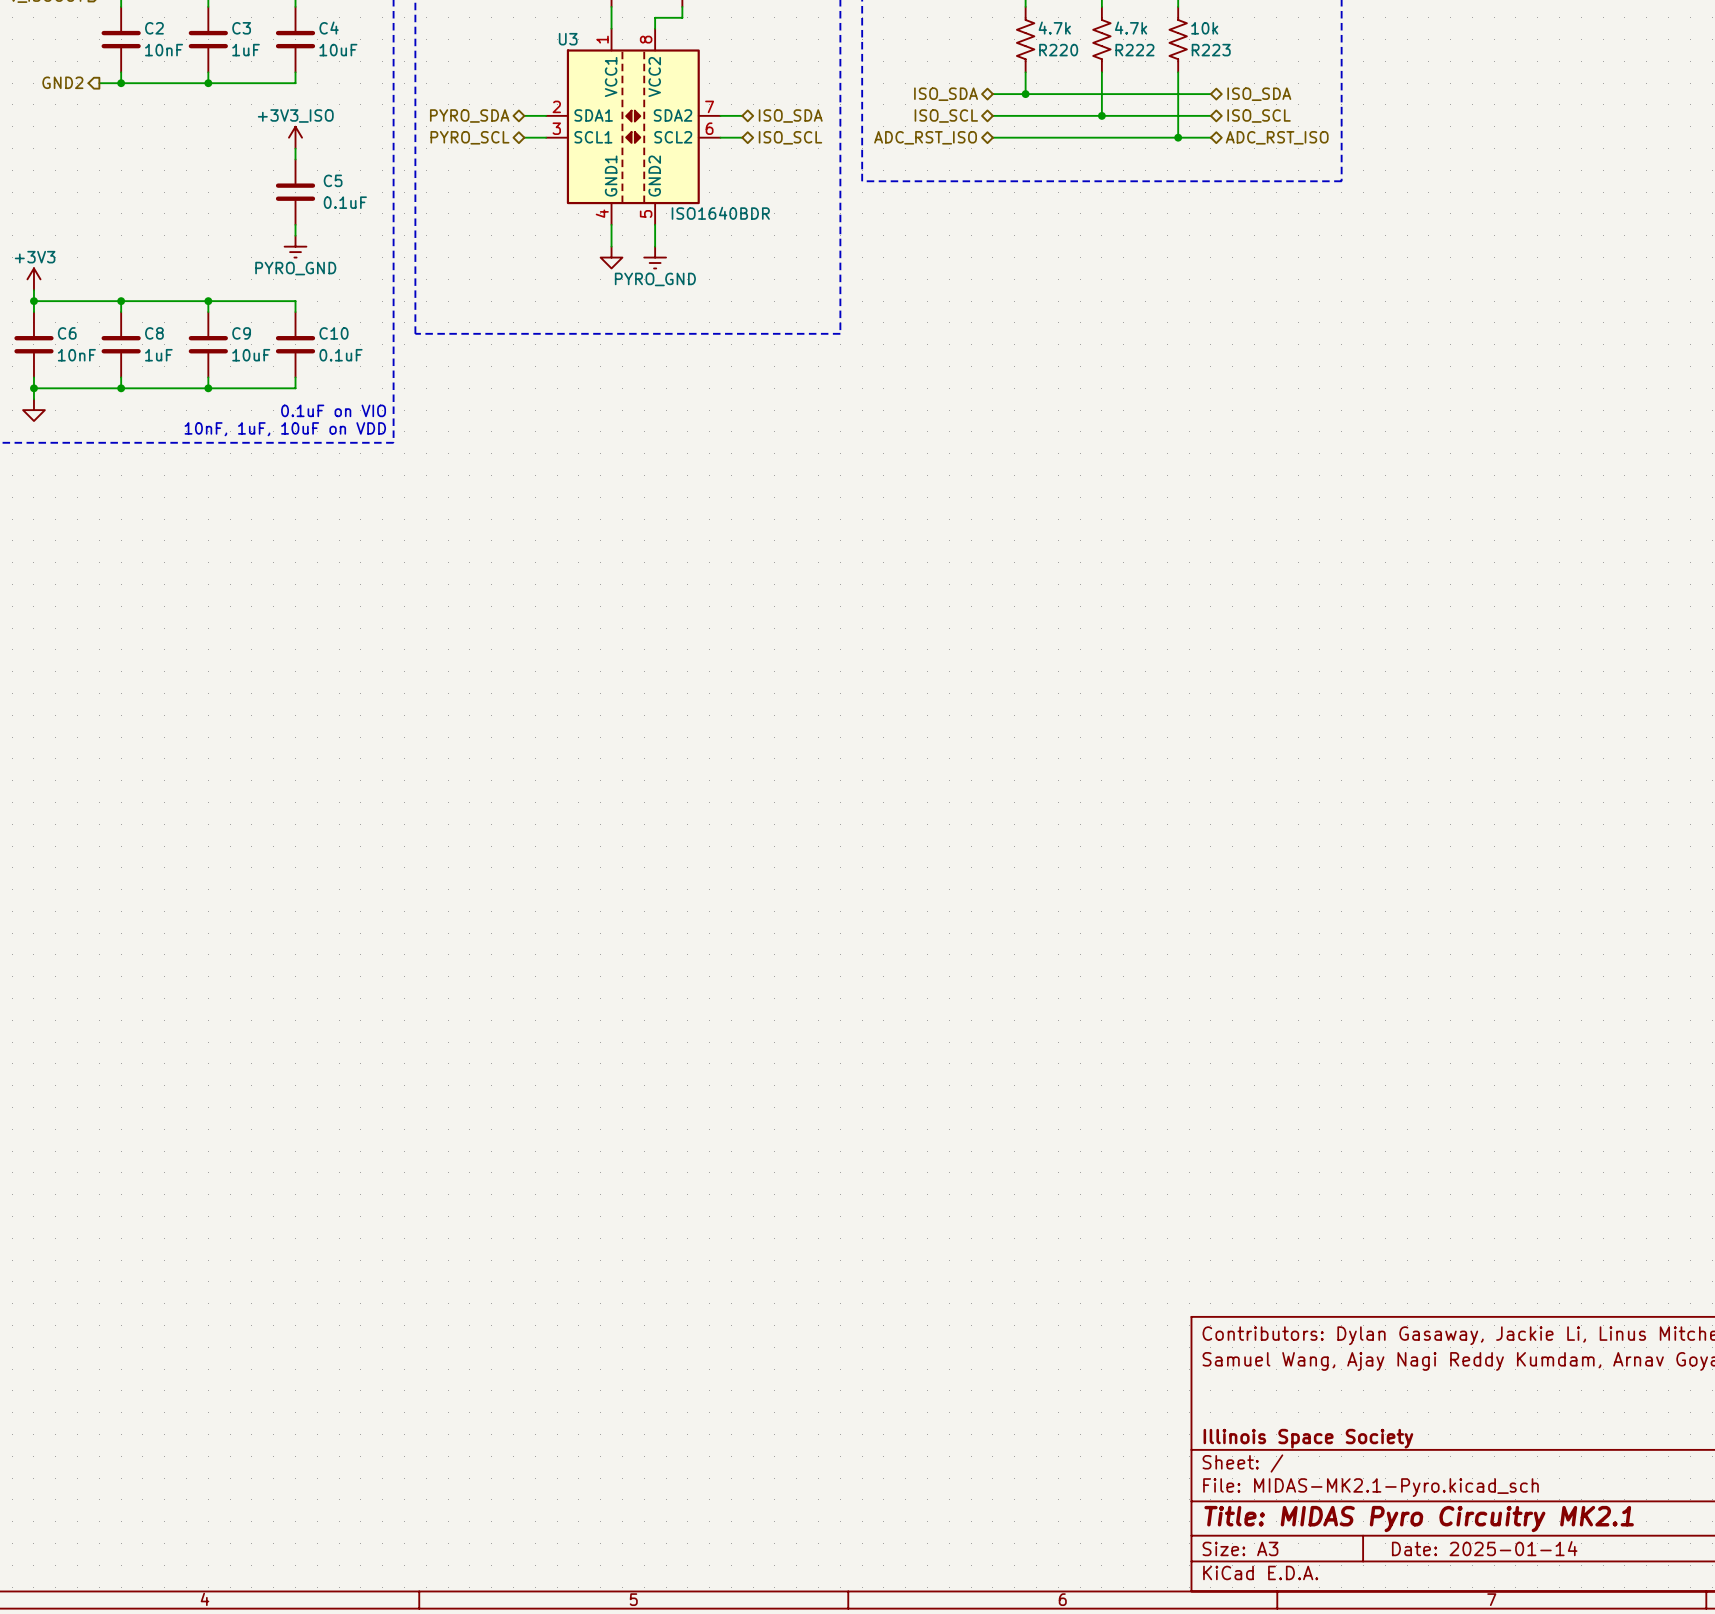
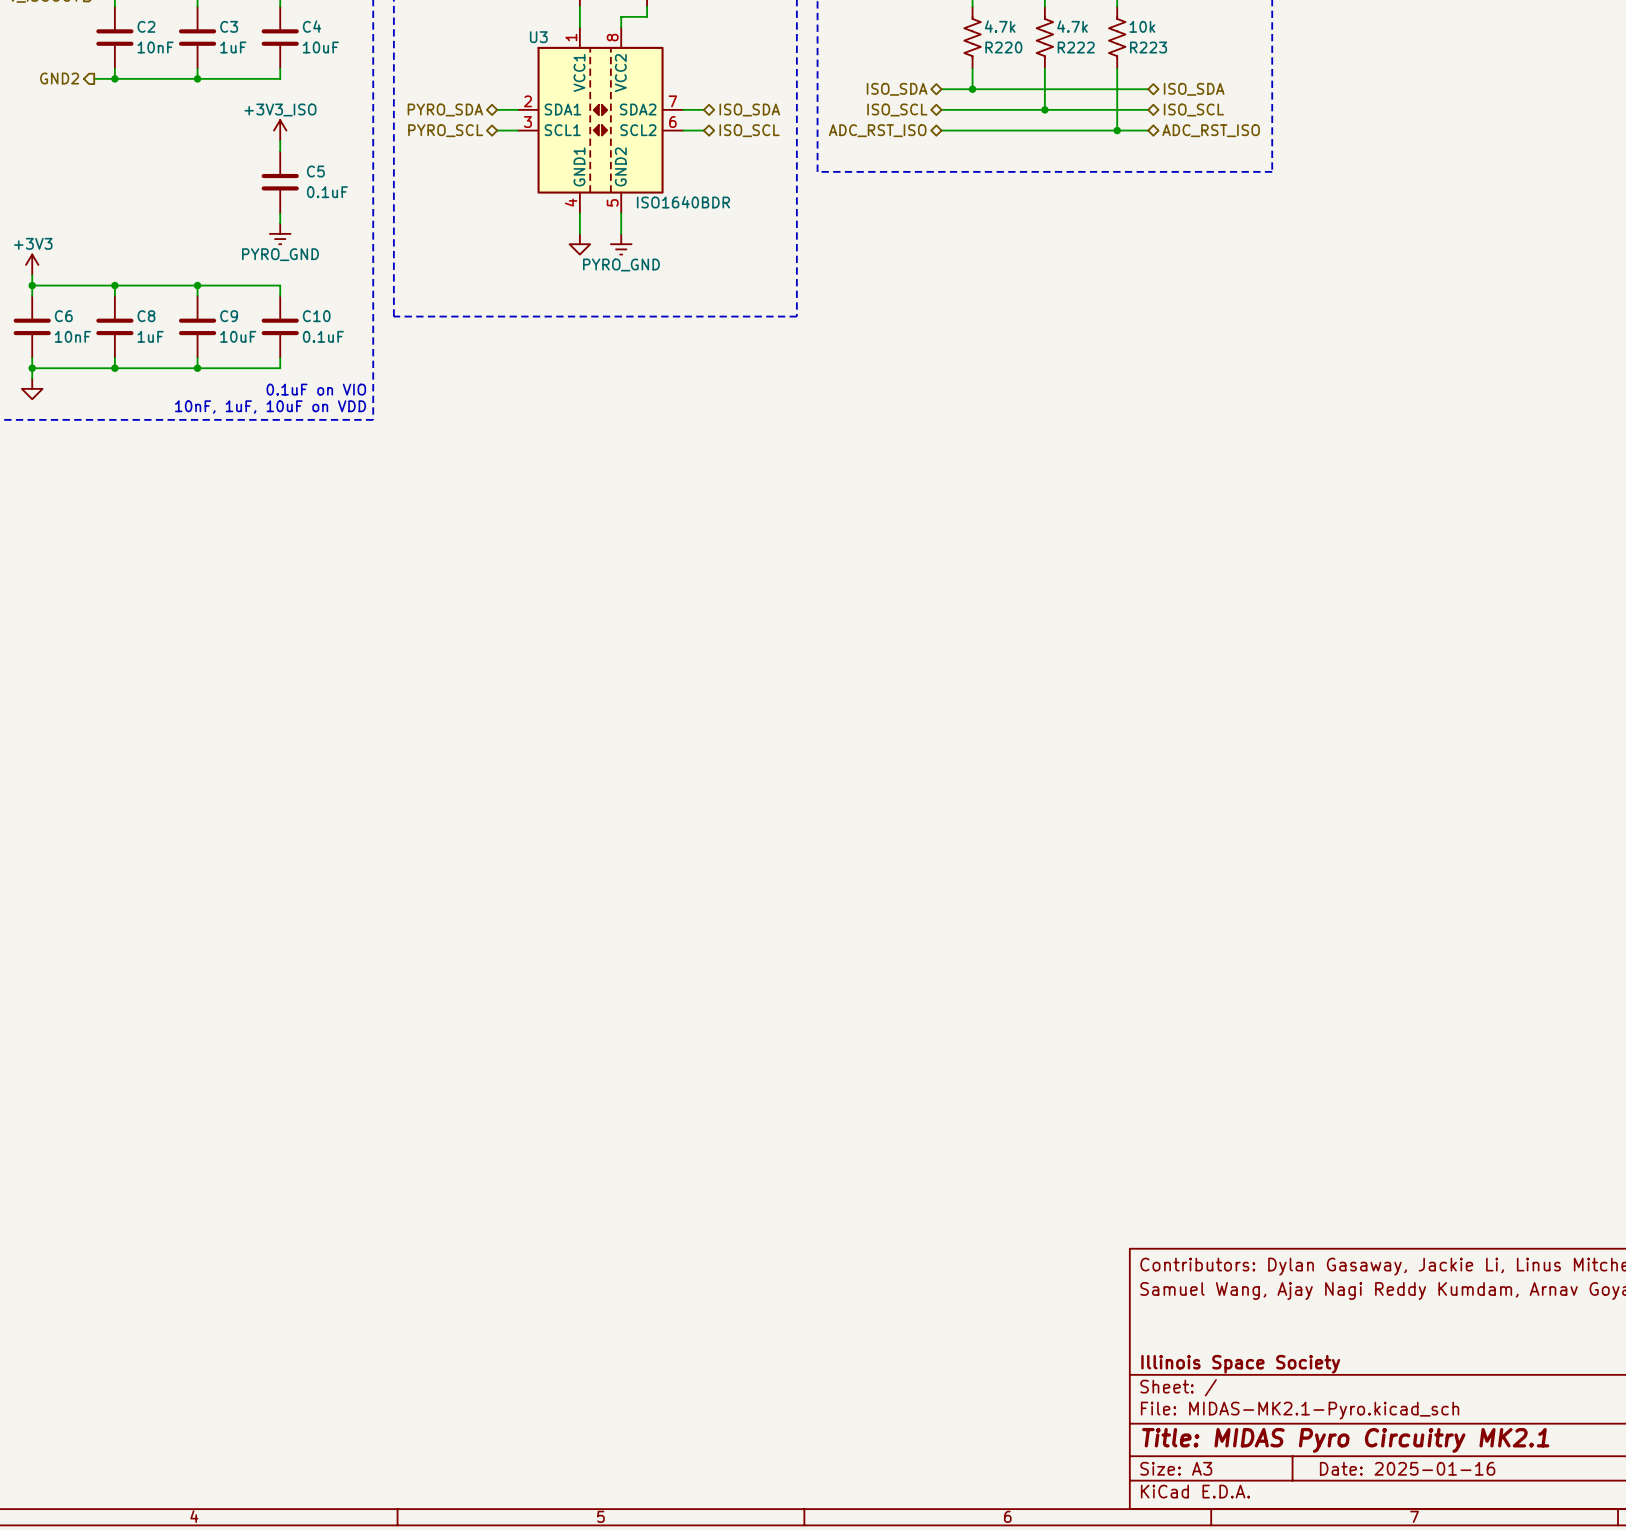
title block: Date: 2025-01-14 (1484, 1548) -> Date: 2025-01-16 (1407, 1468)

